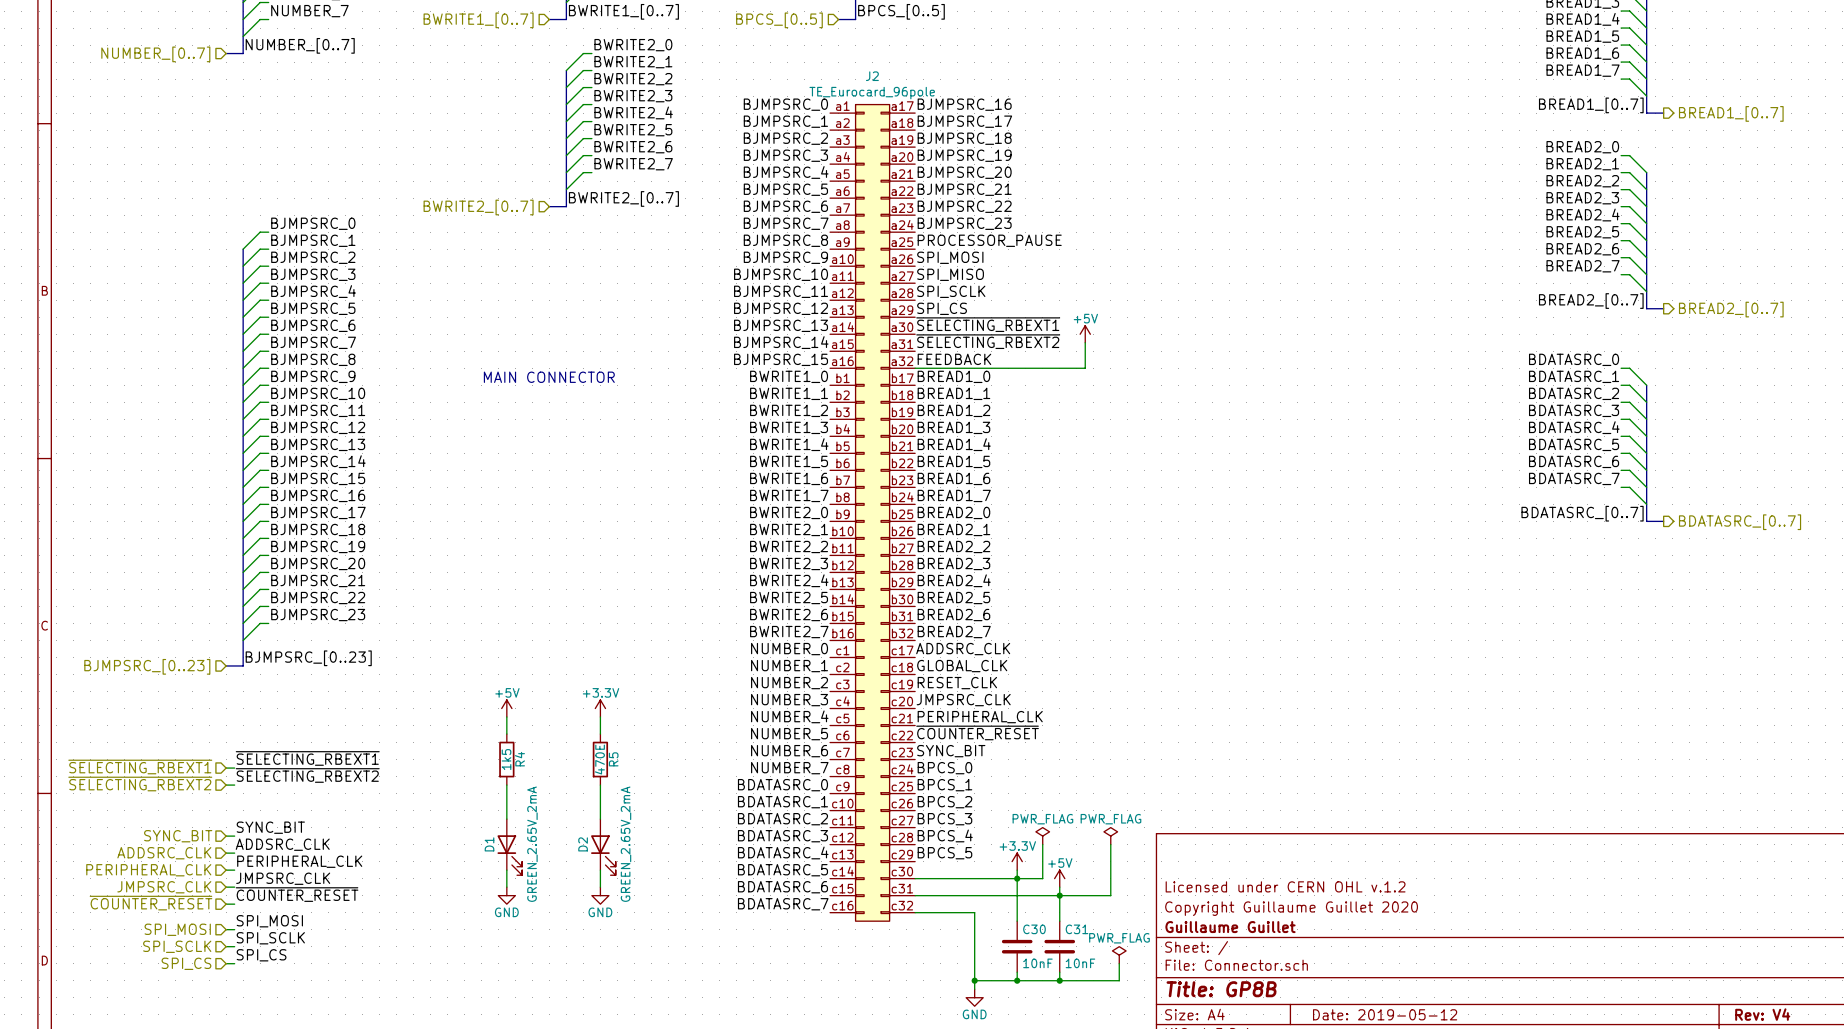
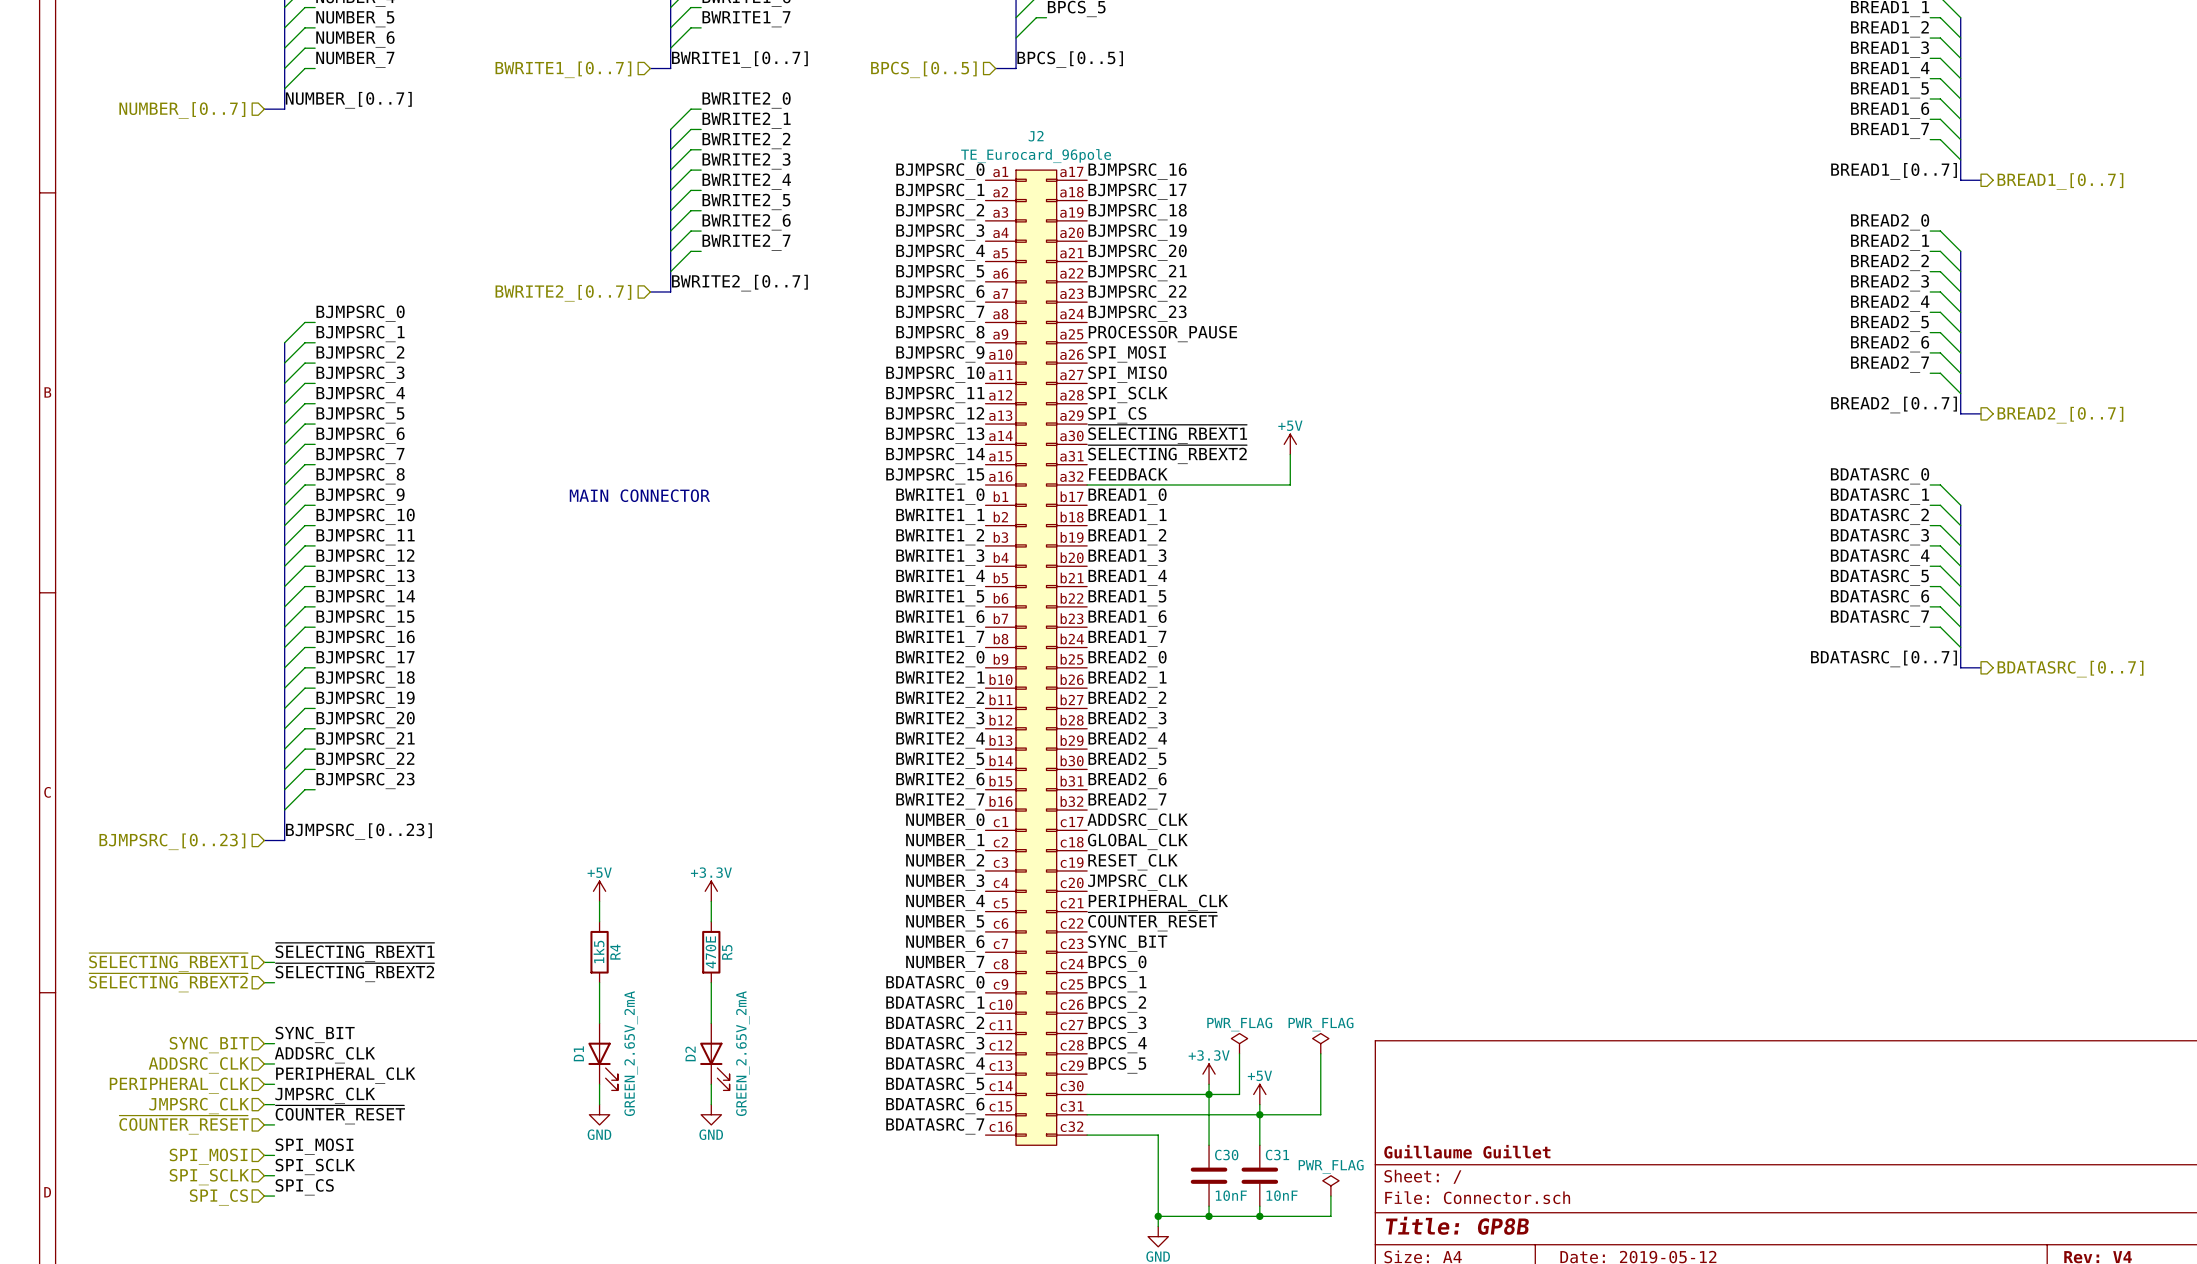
title block: Licensed under CERN OHL v.1.2 (1285, 886) -> none
title block: Copyright Guillaume Guillet 2020 (1291, 908) -> none

